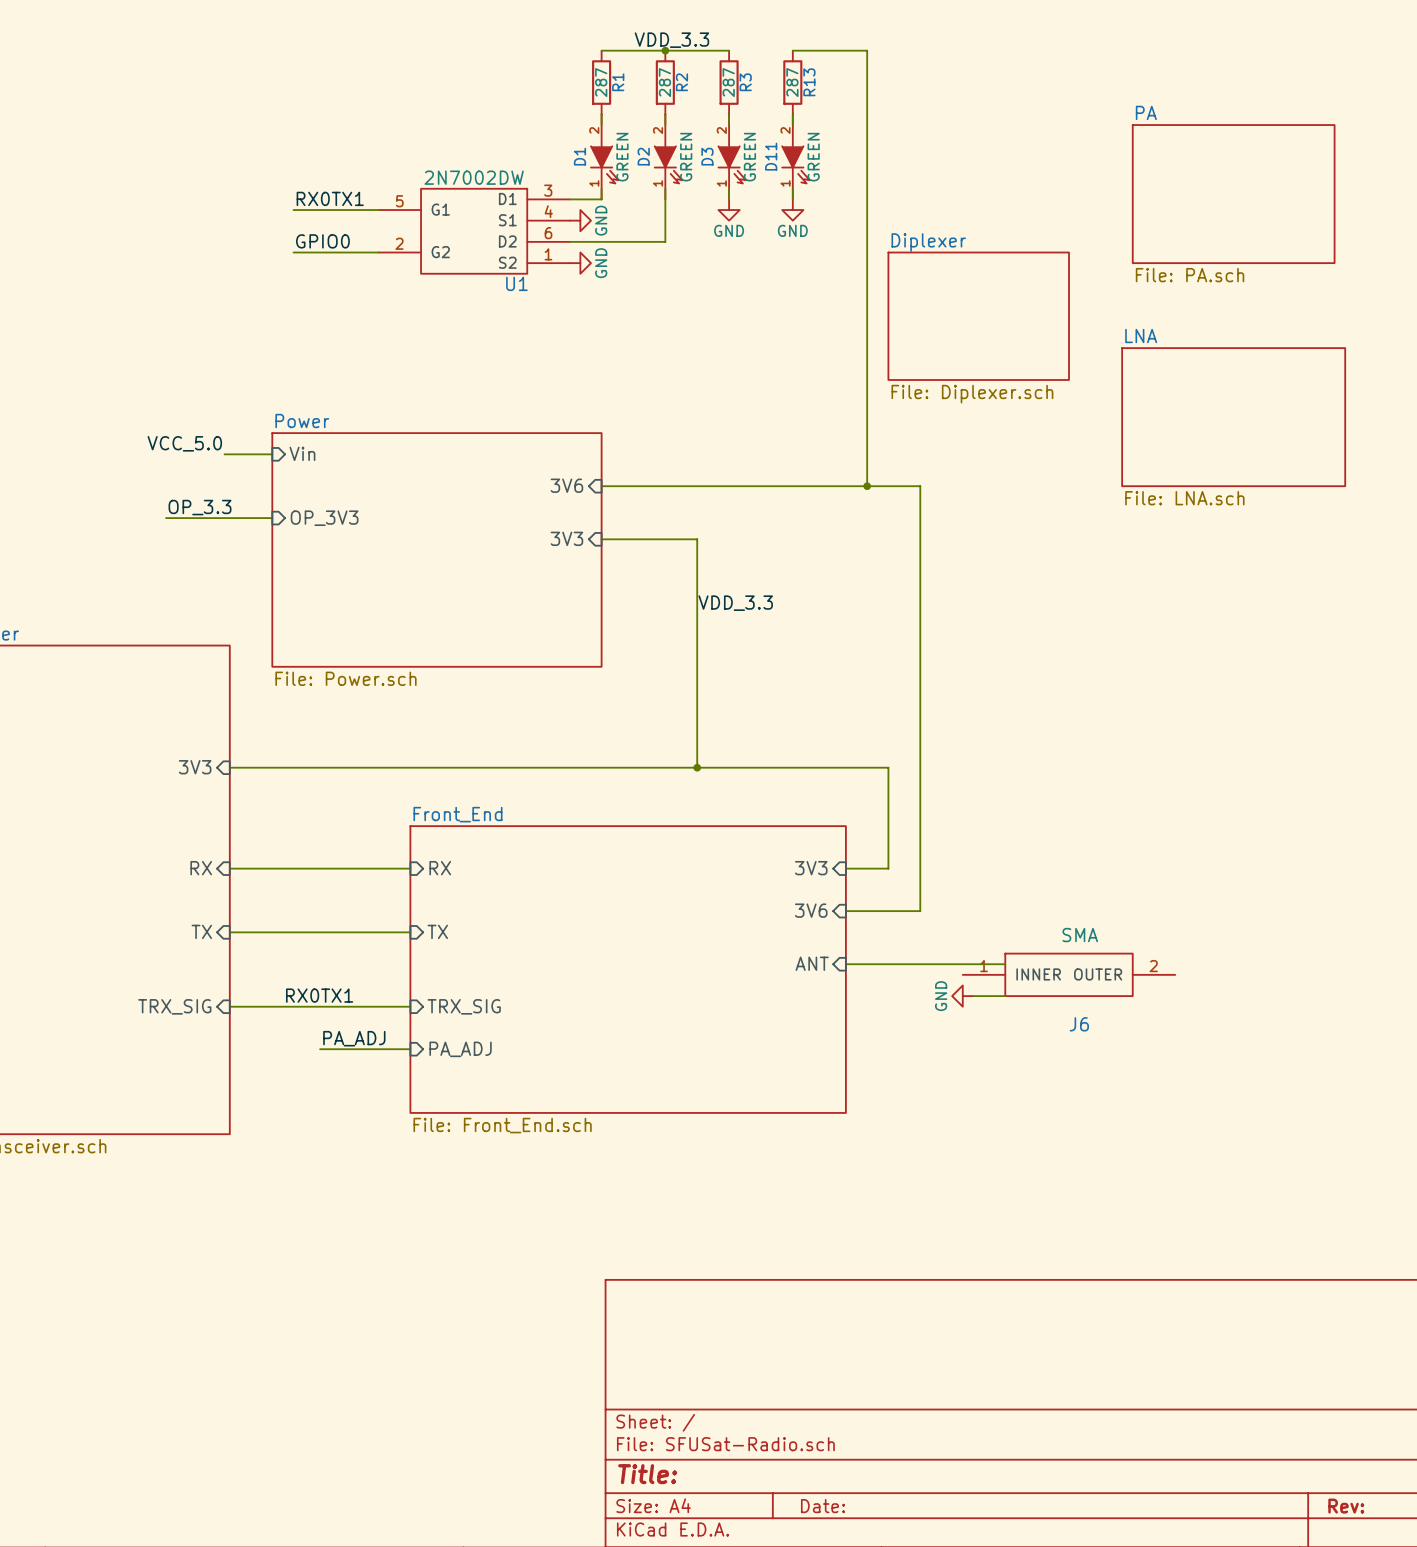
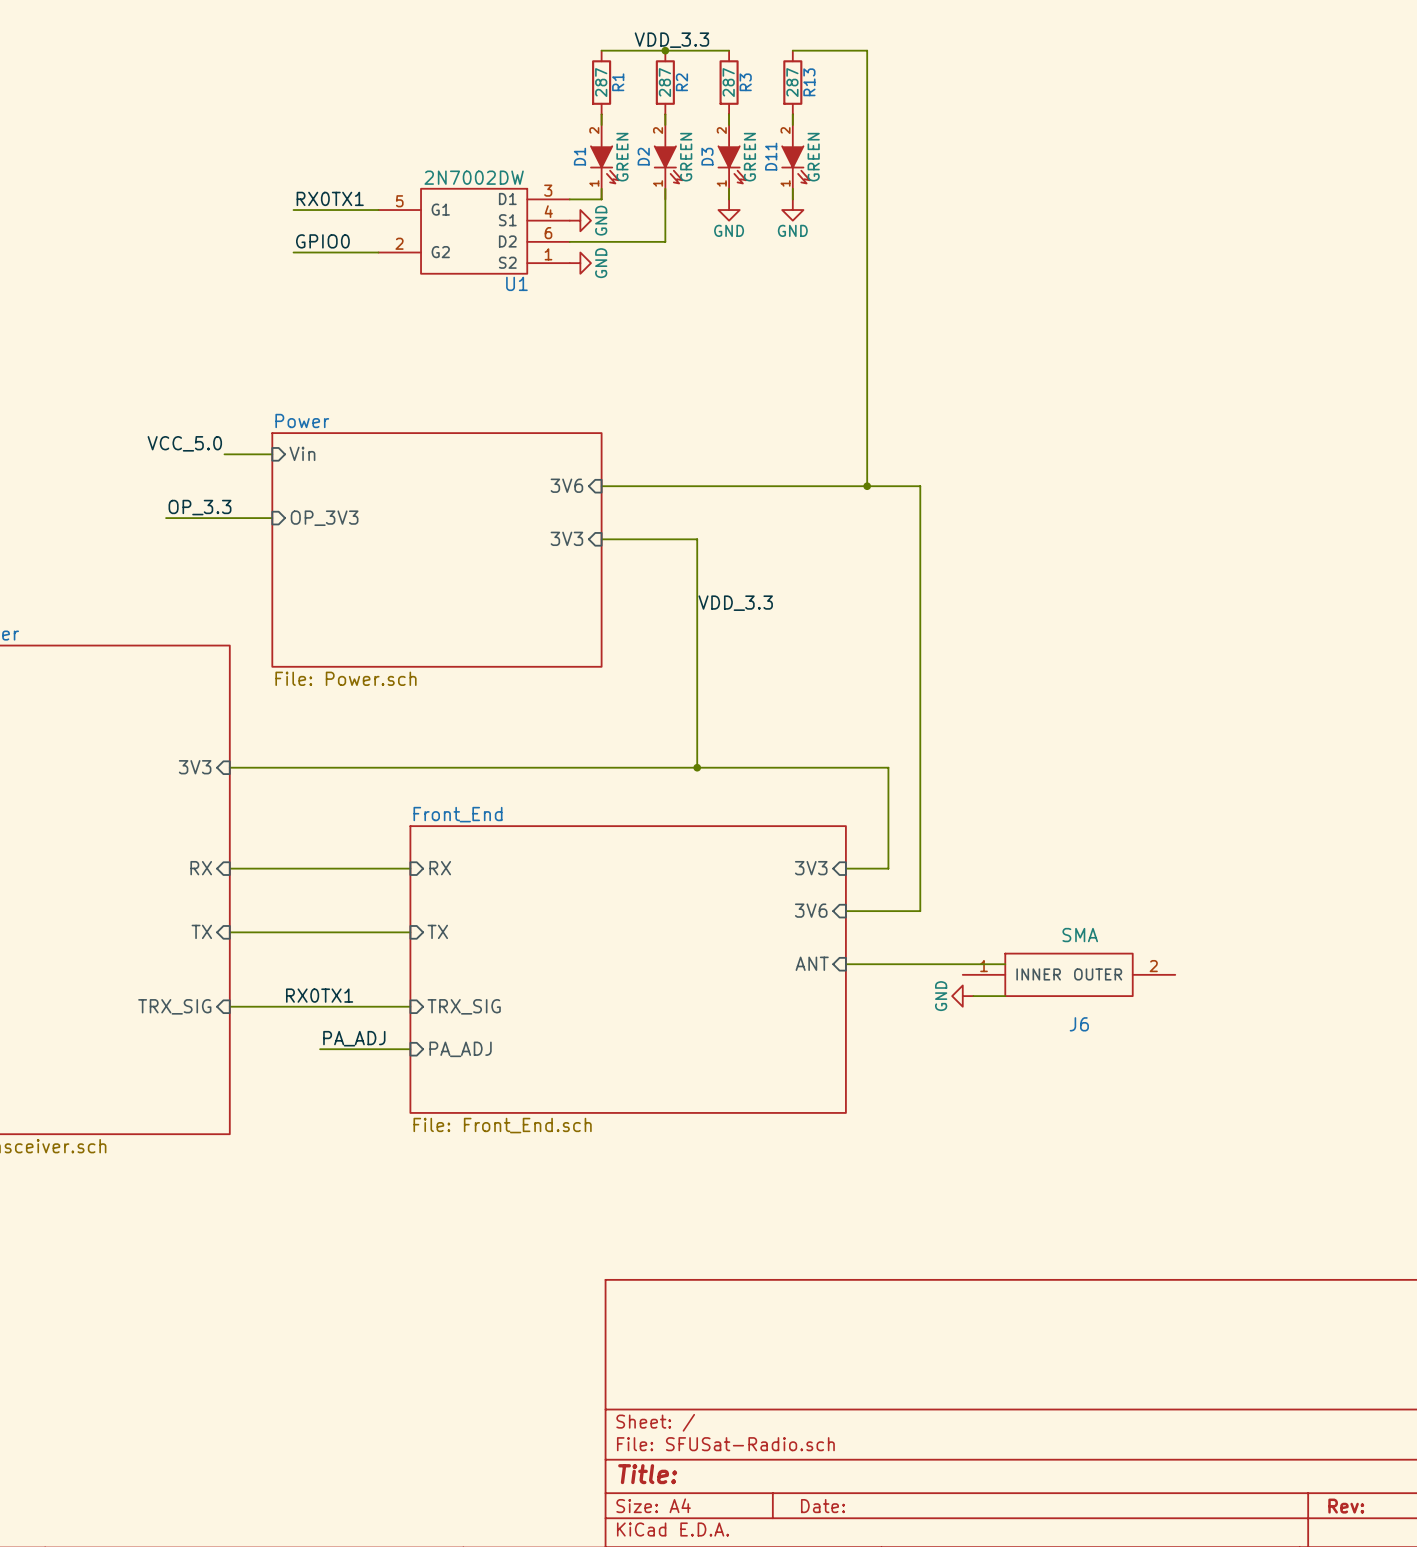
sheet PA: File: PA.sch (1233, 194) -> none
sheet Diplexer: File: Diplexer.sch (978, 316) -> none
sheet LNA: File: LNA.sch (1233, 417) -> none

